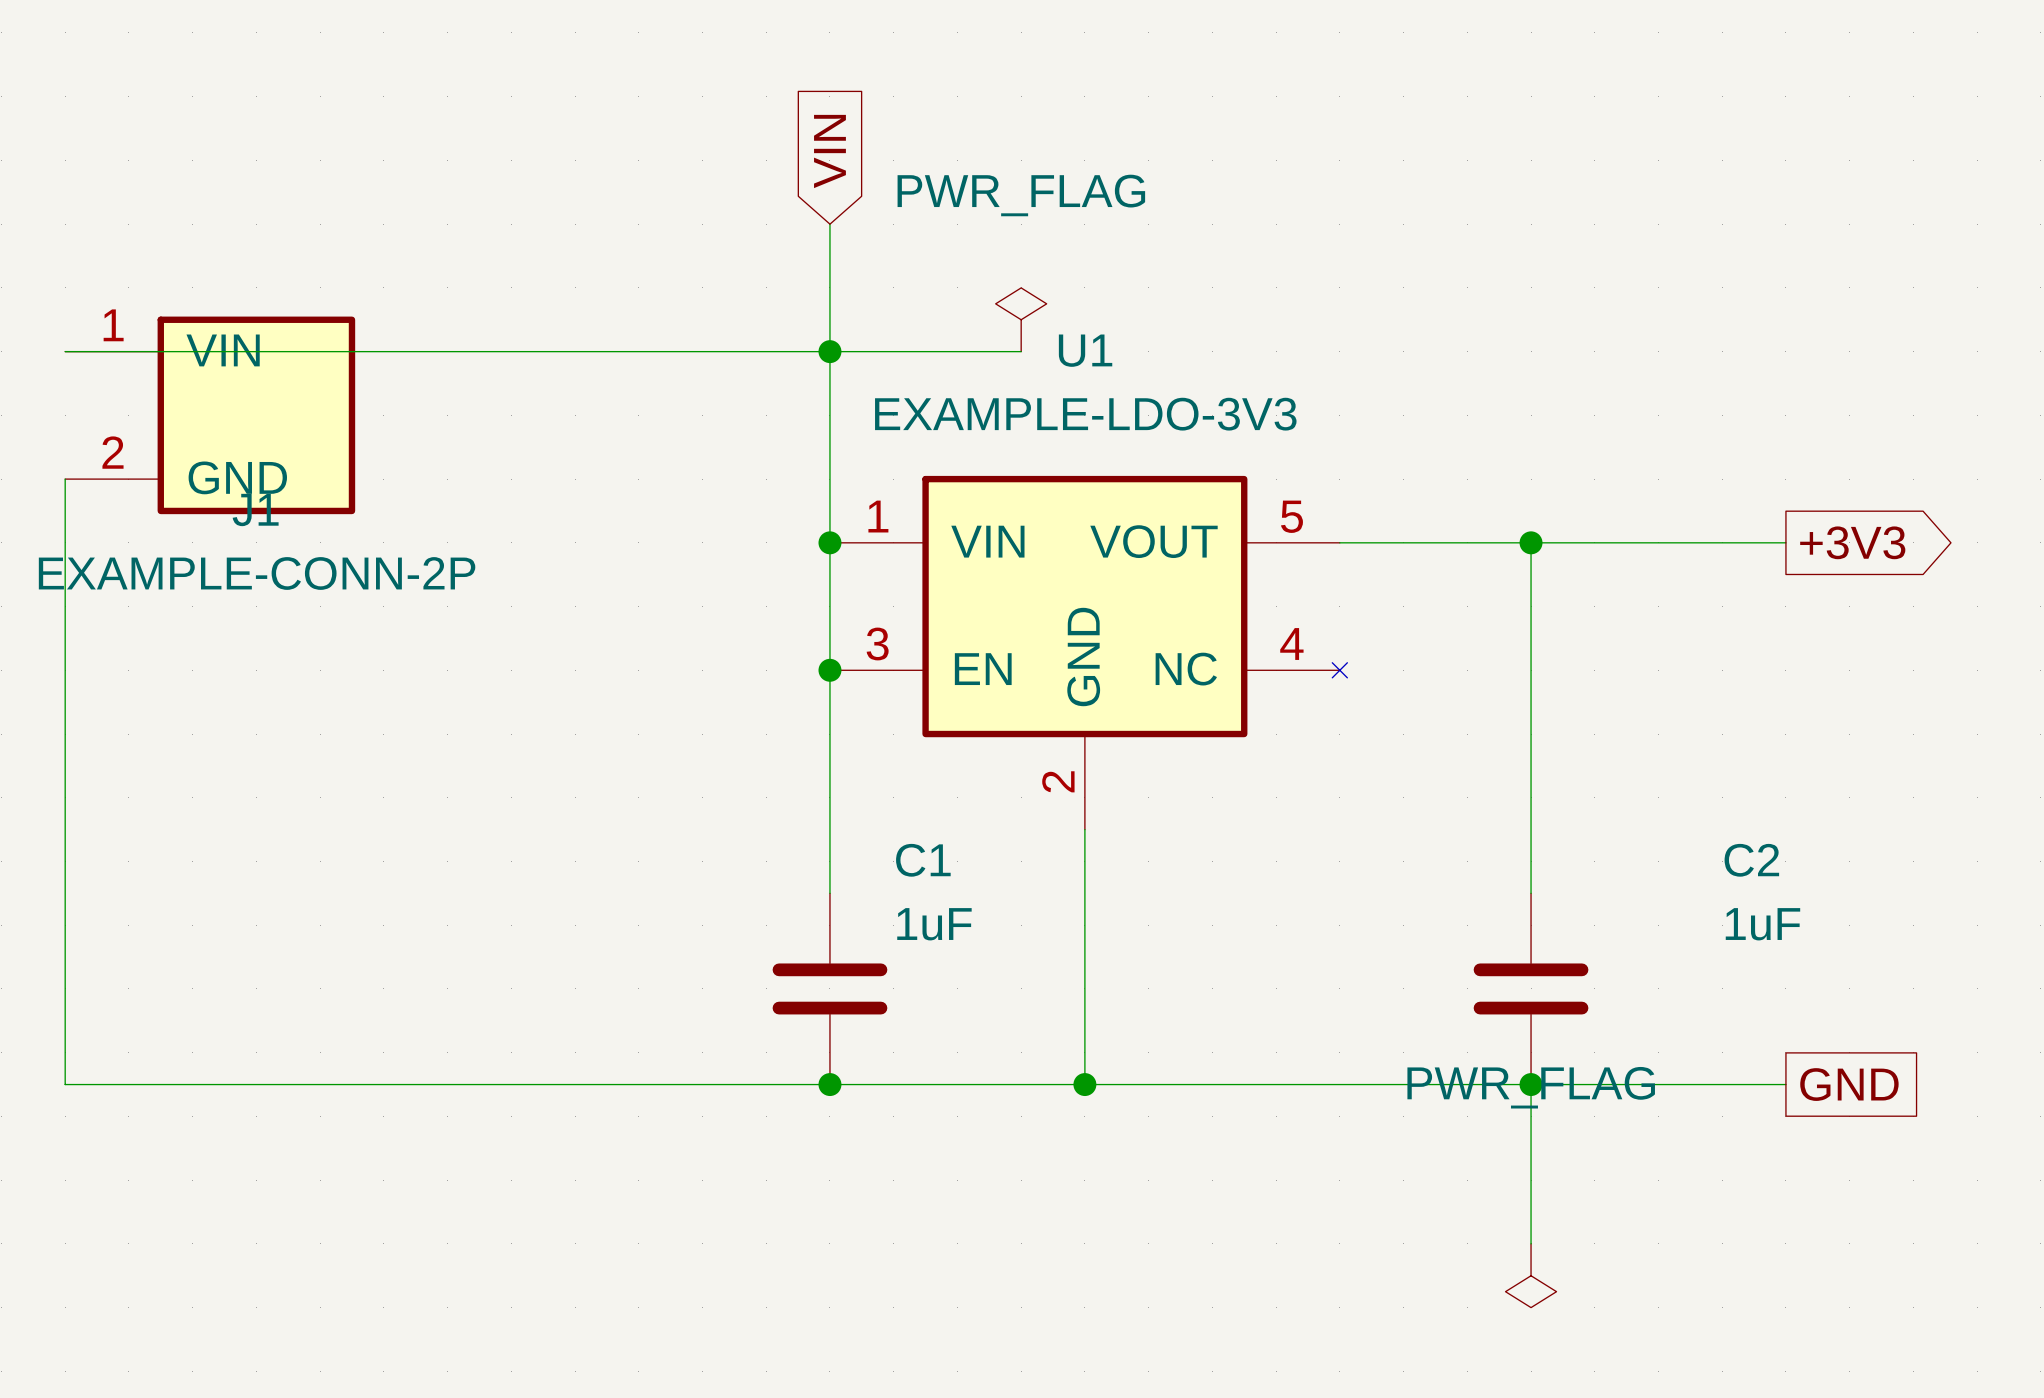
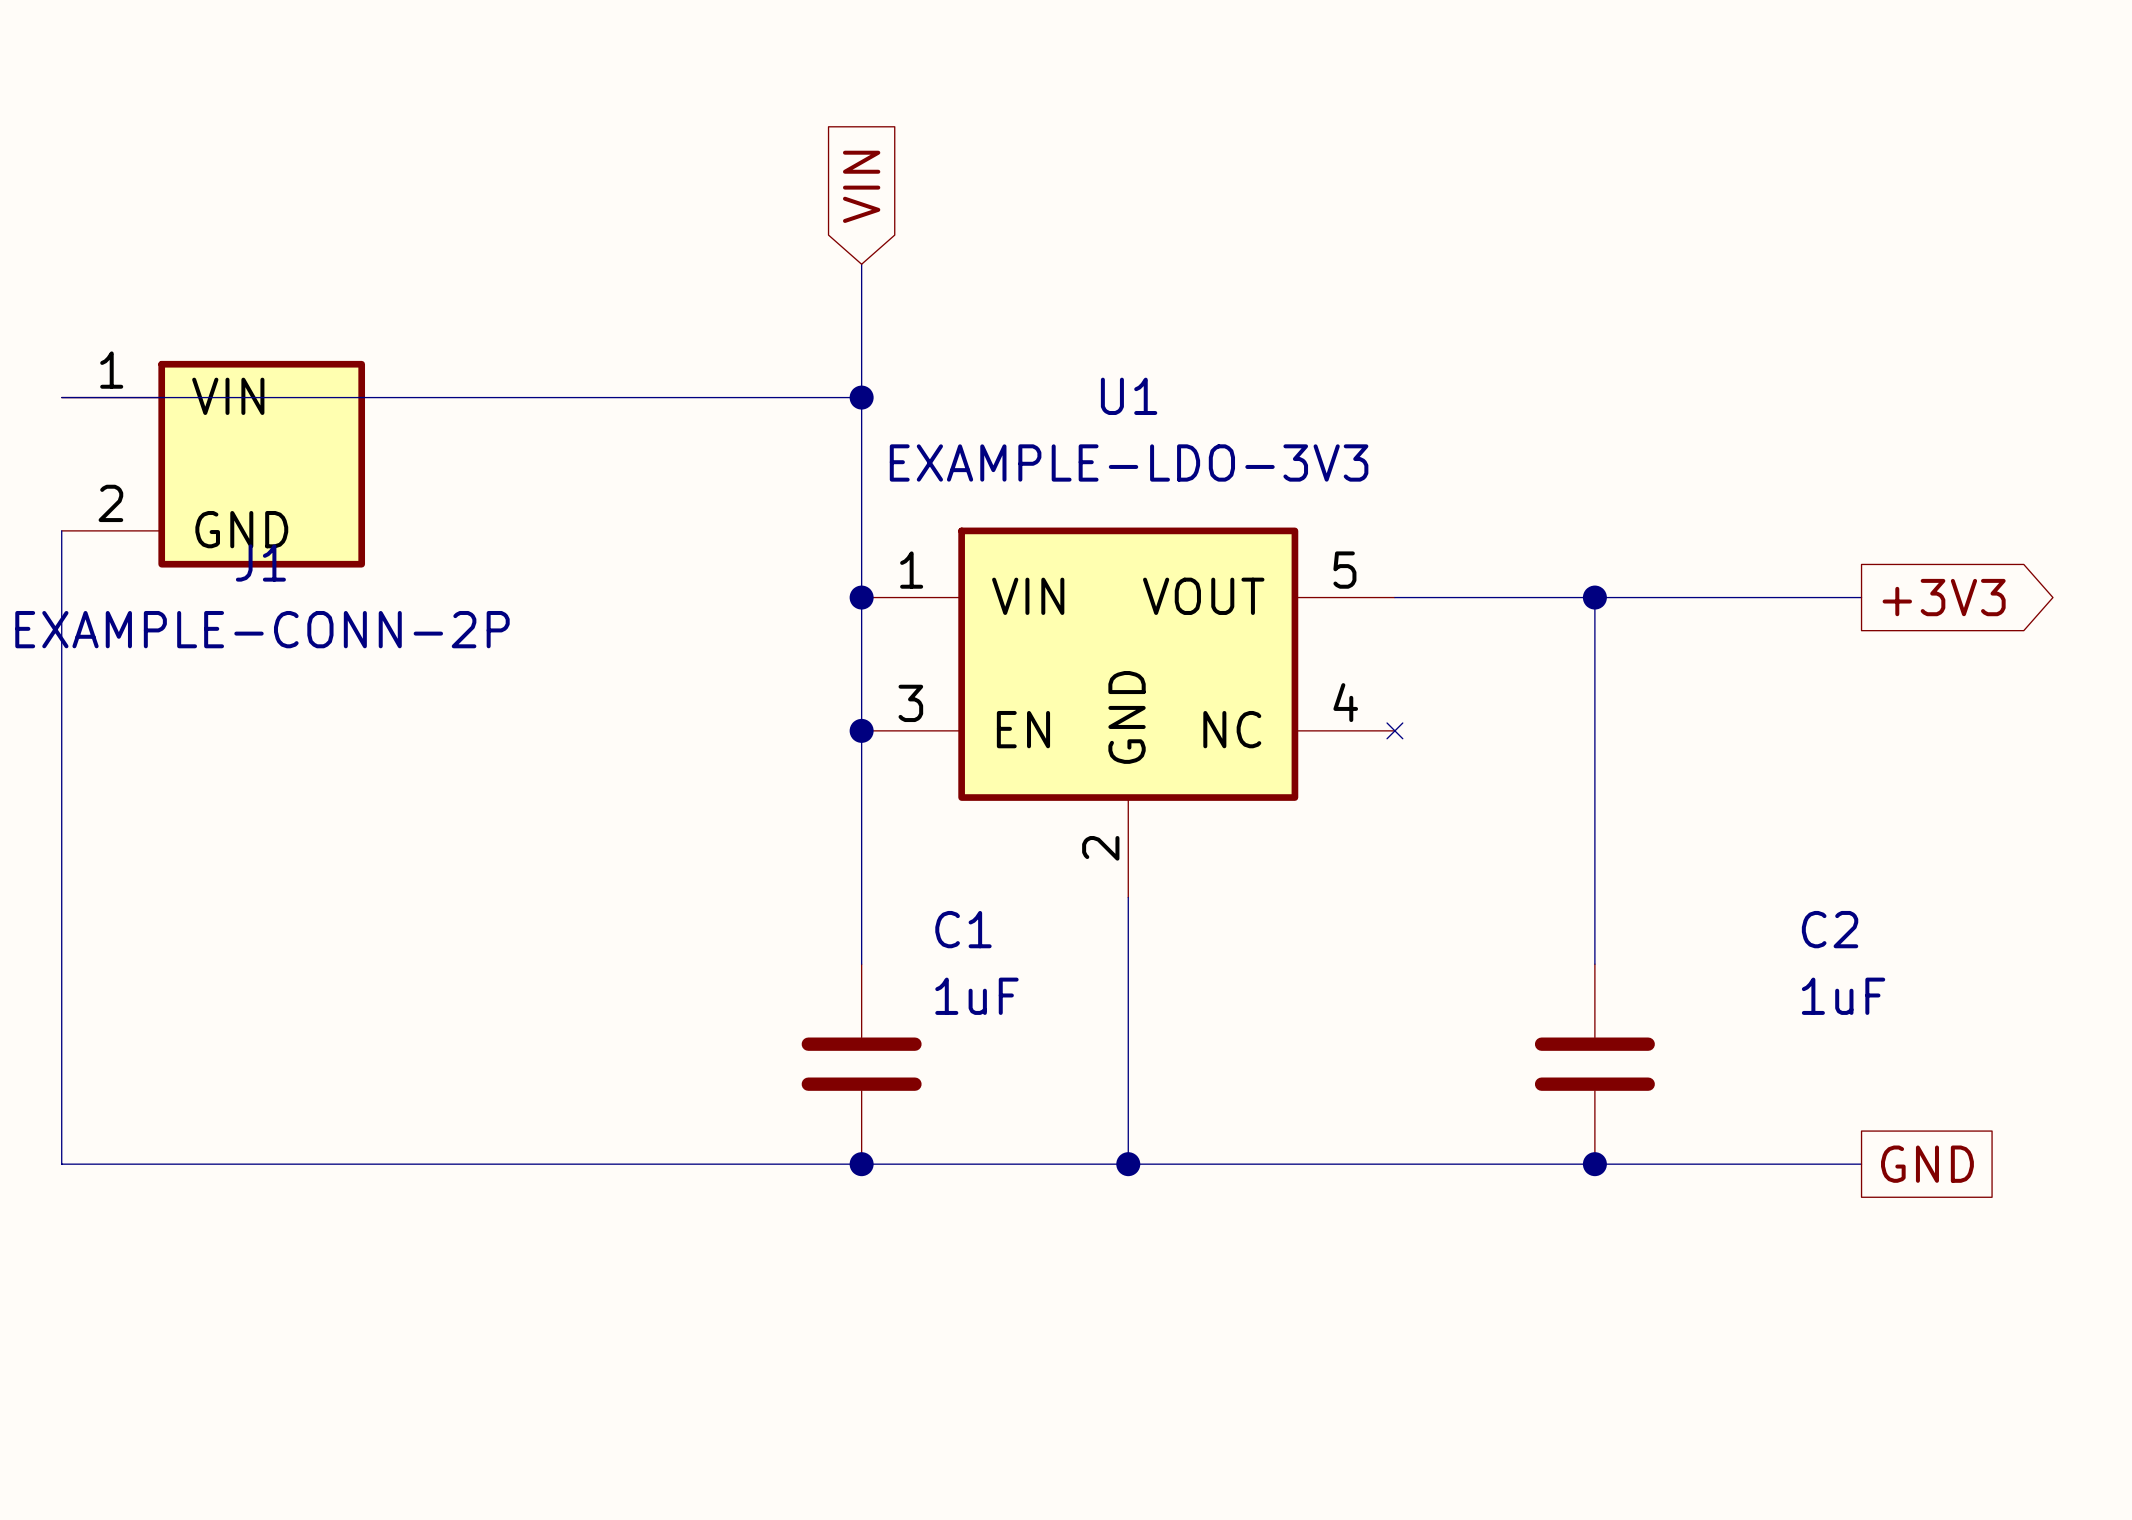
power symbol: PWR_FLAG (1021, 319) -> none
wire: (829, 351) (1021, 351) -> none
wire: (1531, 1084) (1531, 1243) -> none
power symbol: PWR_FLAG (1531, 1275) -> none

